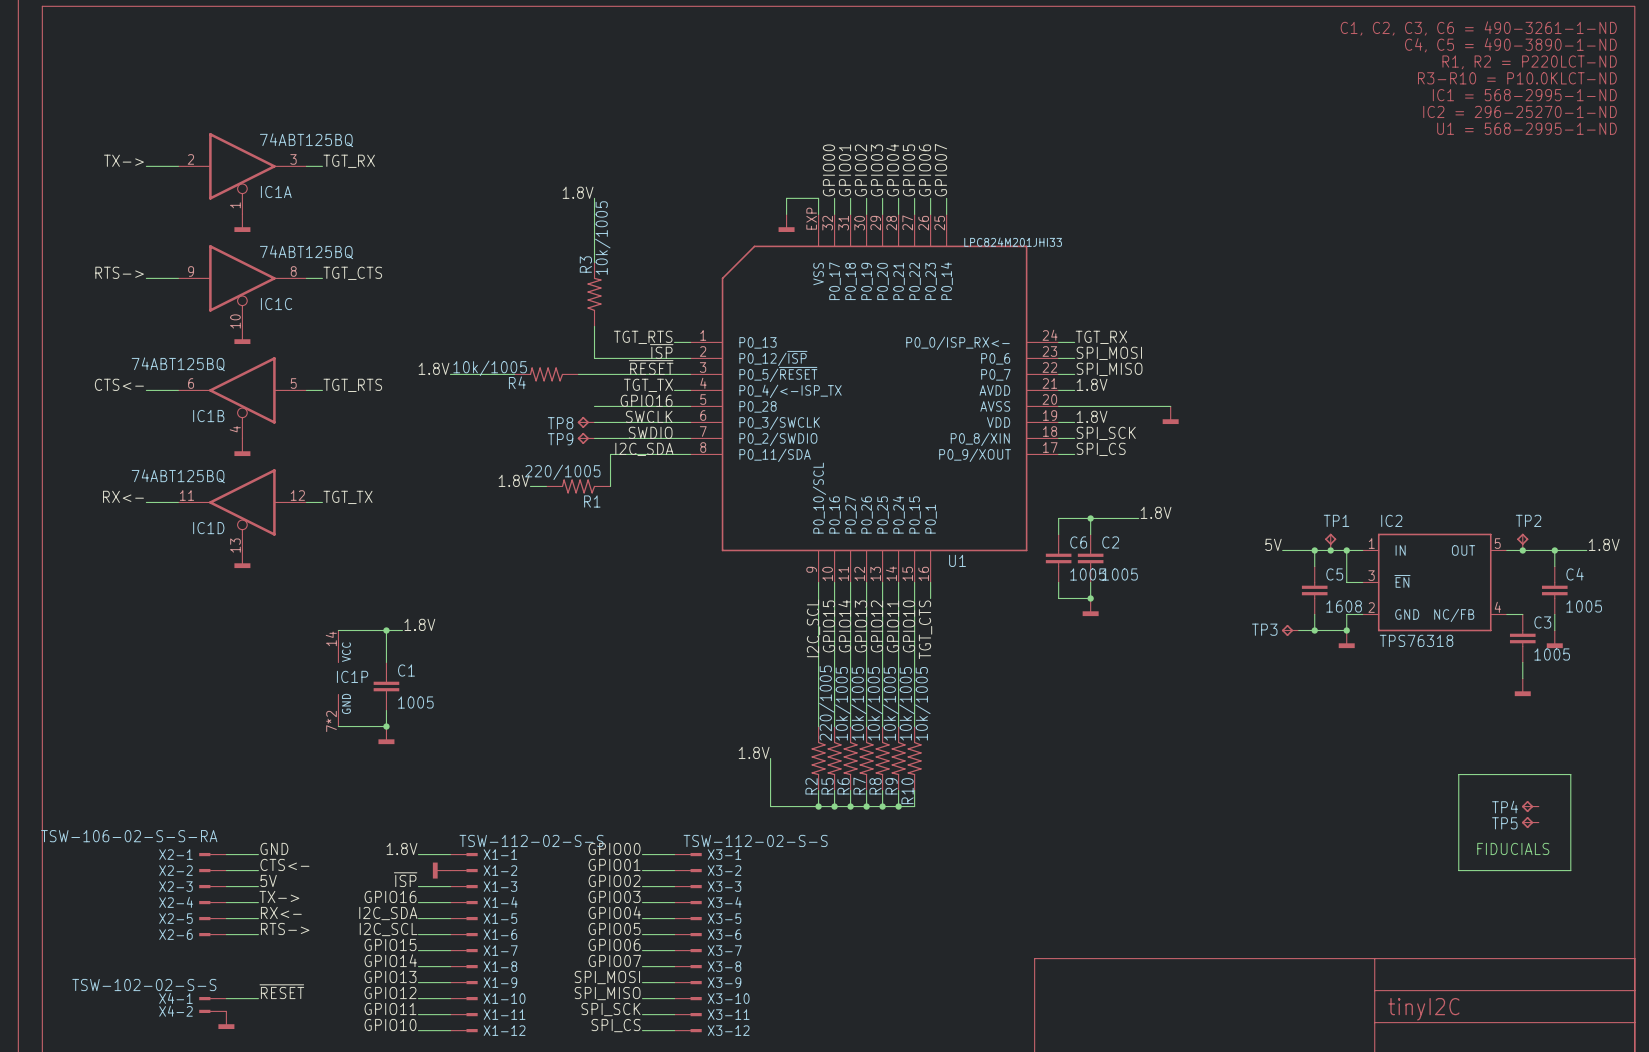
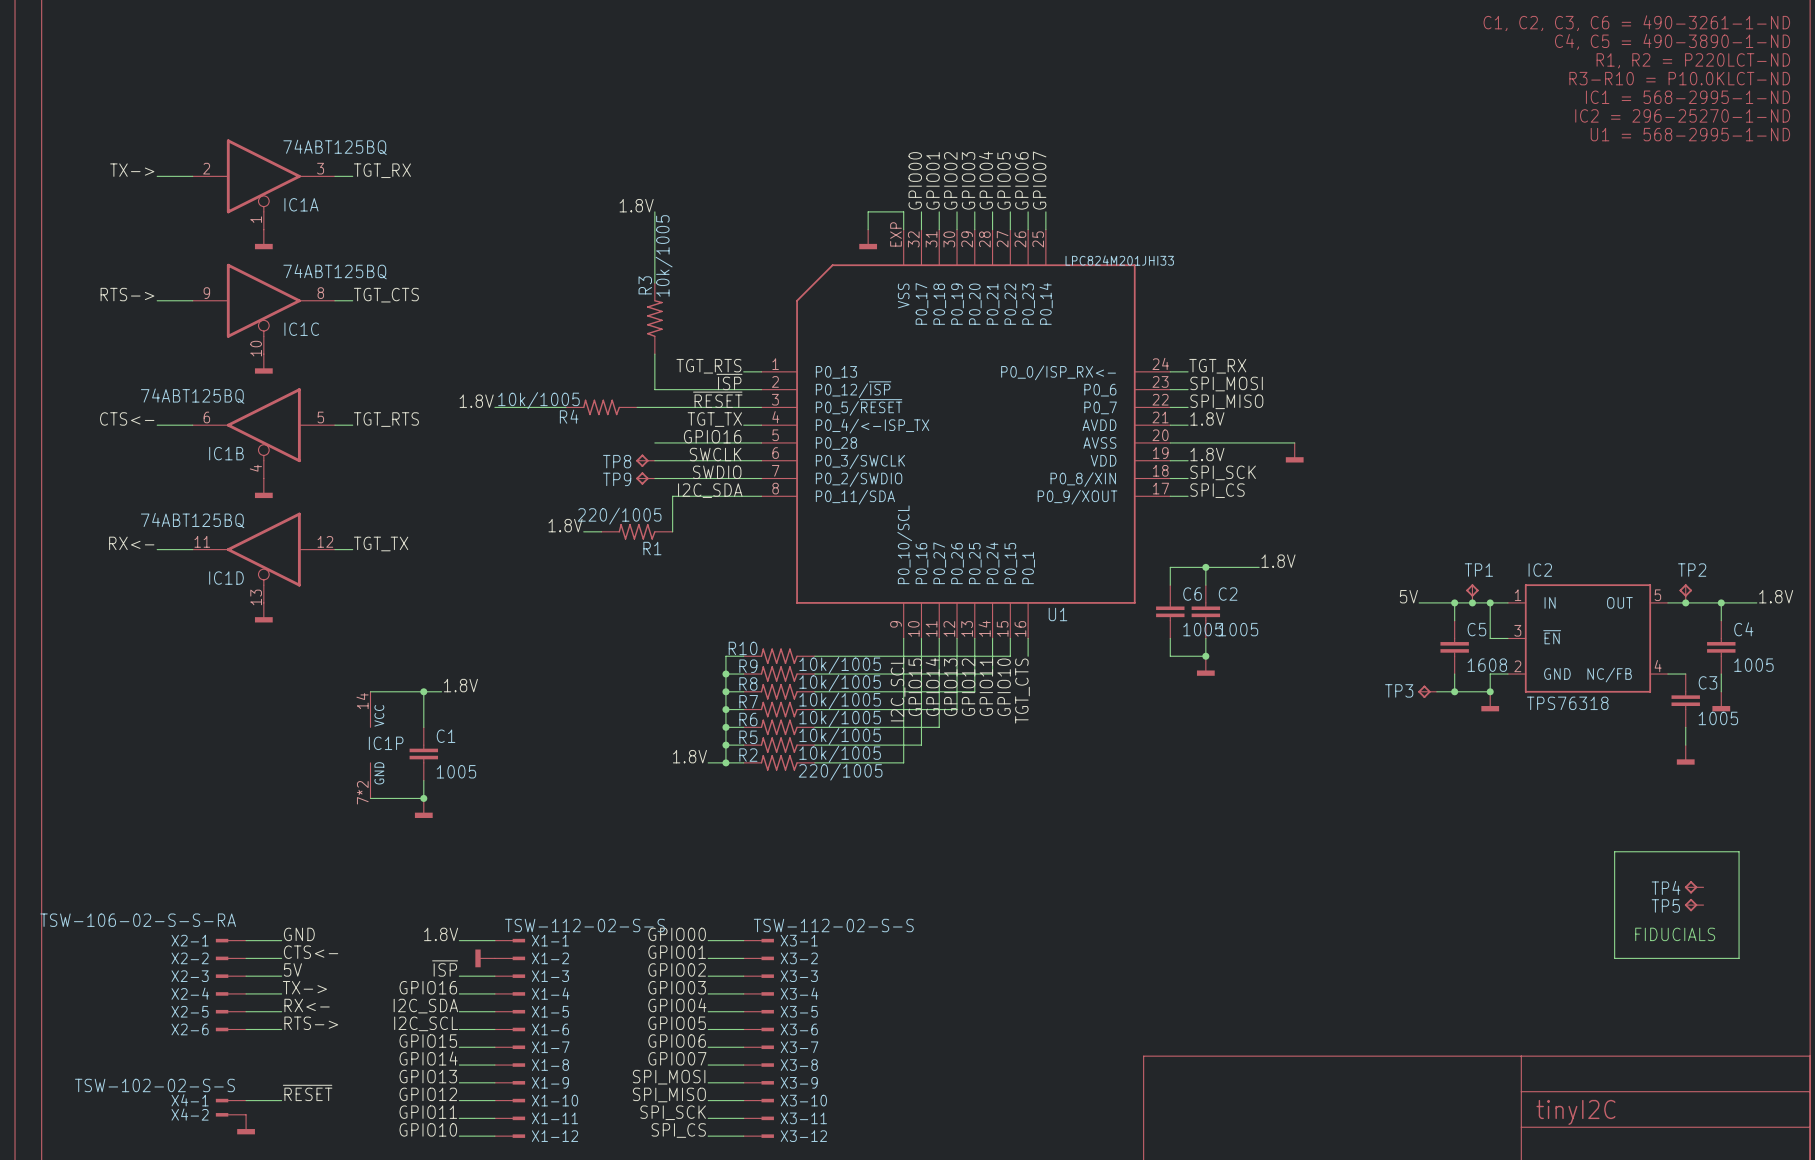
wire: none -> (743, 656) (725, 656) (725, 762)
wire: (914, 598) (914, 726) -> (1010, 656) (814, 656)
wire: none -> (725, 674) (743, 674)
junction: none -> (725, 674)
wire: (898, 614) (898, 726) -> (992, 674) (814, 674)
wire: none -> (725, 691) (743, 691)
junction: none -> (725, 691)
wire: (882, 630) (882, 726) -> (974, 691) (814, 691)
wire: none -> (725, 709) (743, 709)
junction: none -> (725, 709)
wire: (866, 646) (866, 726) -> (957, 709) (814, 709)
wire: none -> (725, 727) (743, 727)
junction: none -> (725, 727)
wire: (850, 662) (850, 726) -> (939, 727) (814, 727)
wire: none -> (725, 745) (743, 745)
junction: none -> (725, 745)
wire: (834, 678) (834, 726) -> (921, 745) (814, 745)
wire: none -> (708, 762) (743, 762)
junction: none -> (725, 762)
wire: (818, 694) (818, 726) -> (903, 762) (814, 762)
label position: 1.8V (754, 752) -> 1.8V (689, 756)
wire: (770, 758) (770, 806) (914, 806) (914, 790) -> none
R2 rotation: 0° (818, 758) -> 90° clockwise (779, 762)
R2 position: (818, 758) -> (779, 762)
R5 rotation: 0° (834, 758) -> 90° clockwise (779, 745)
R5 position: (834, 758) -> (779, 745)
R6 rotation: 0° (850, 758) -> 90° clockwise (779, 727)
R6 position: (850, 758) -> (779, 727)
R7 rotation: 0° (866, 758) -> 90° clockwise (779, 709)
R7 position: (866, 758) -> (779, 709)
R8 rotation: 0° (882, 758) -> 90° clockwise (779, 691)
R8 position: (882, 758) -> (779, 691)
R9 rotation: 0° (898, 758) -> 90° clockwise (779, 674)
R9 position: (898, 758) -> (779, 674)
R10 rotation: 0° (914, 758) -> 90° clockwise (779, 656)
R10 position: (914, 758) -> (779, 656)
wire: (818, 790) (818, 806) -> none
wire: (834, 790) (834, 806) -> none
wire: (850, 790) (850, 806) -> none
wire: (866, 790) (866, 806) -> none
wire: (882, 790) (882, 806) -> none
wire: (898, 790) (898, 806) -> none
junction: (818, 806) -> none
junction: (834, 806) -> none
junction: (850, 806) -> none
junction: (866, 806) -> none
junction: (882, 806) -> none
junction: (898, 806) -> none

